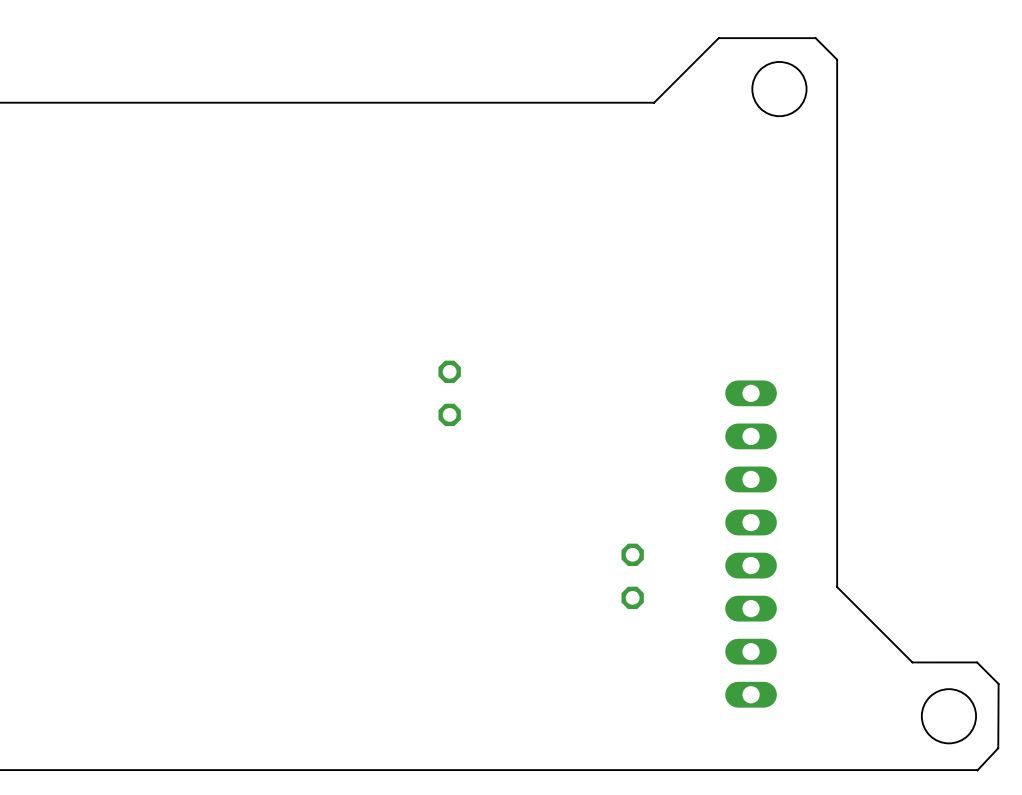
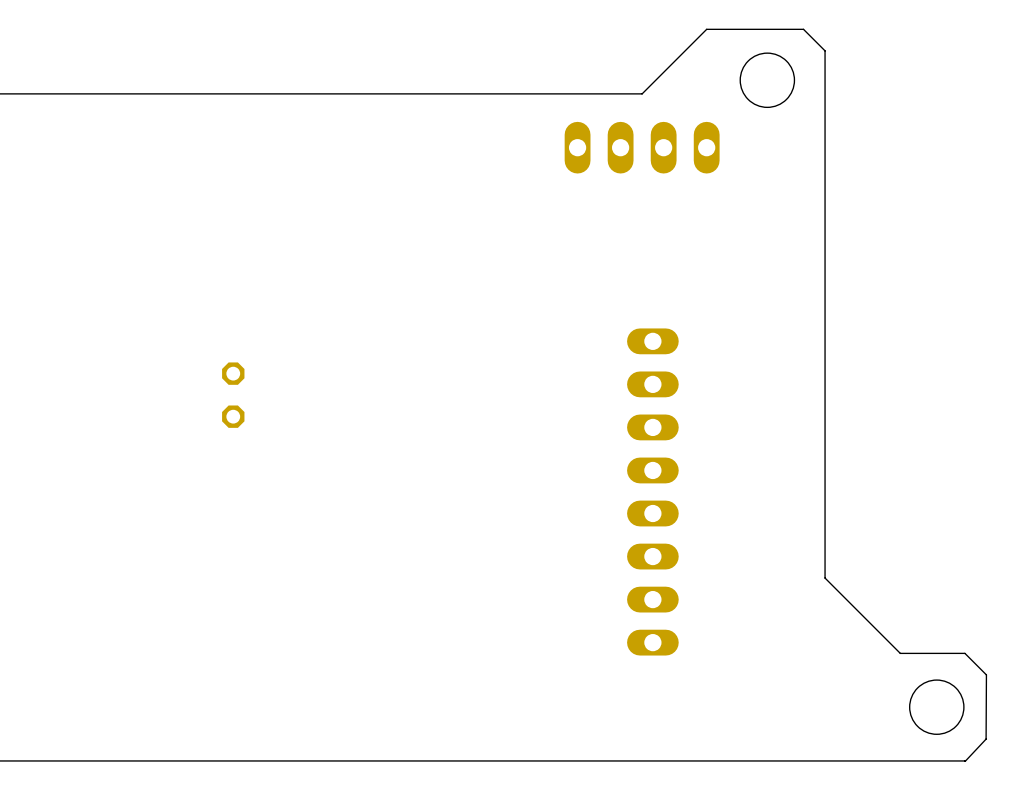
part: none -> (642, 147)
part position: (449, 393) -> (233, 395)
part position: (751, 544) -> (652, 491)
part: (632, 576) -> none

